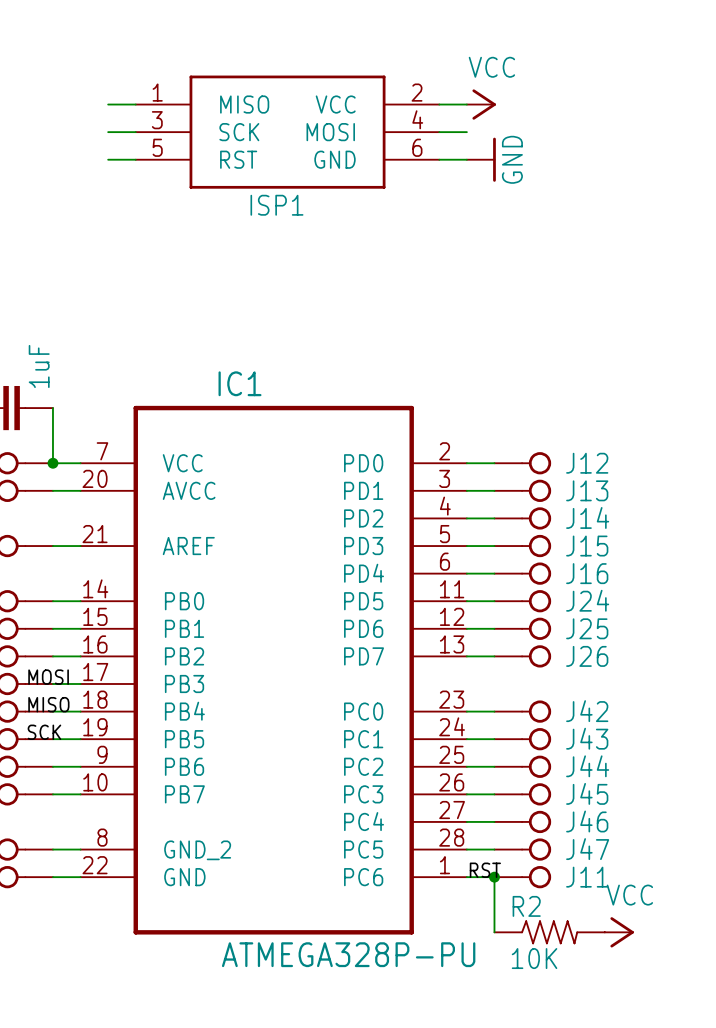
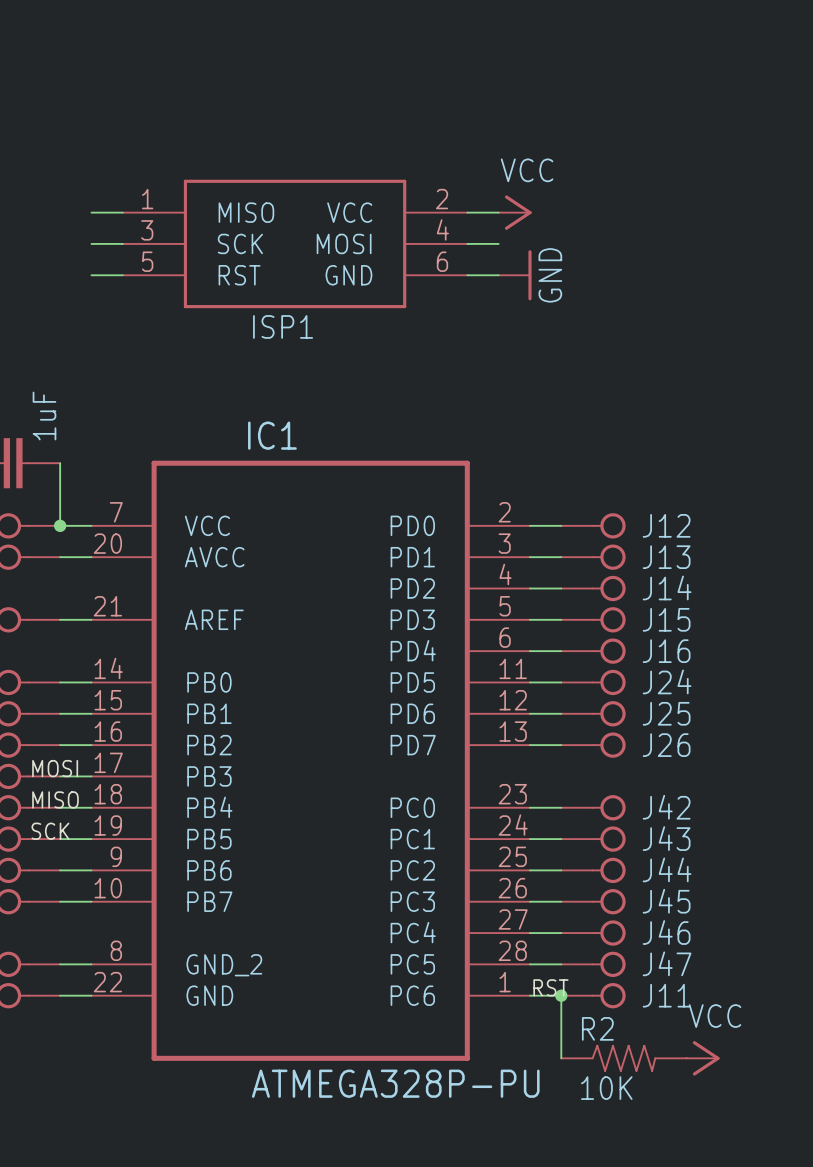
wire: (108, 104) (135, 104) -> (91, 275) (122, 275)
wire: (439, 104) (466, 104) -> (467, 275) (498, 275)
power symbol position: VCC (481, 104) -> VCC (515, 212)
wire: (108, 132) (135, 132) -> (91, 243) (122, 243)
ISP1 position: (287, 132) -> (295, 243)
wire: (439, 132) (466, 132) -> (467, 243) (498, 243)
wire: (108, 159) (135, 159) -> (91, 212) (122, 212)
wire: (439, 159) (466, 159) -> (467, 212) (498, 212)
power symbol position: GND (481, 159) -> GND (515, 275)

